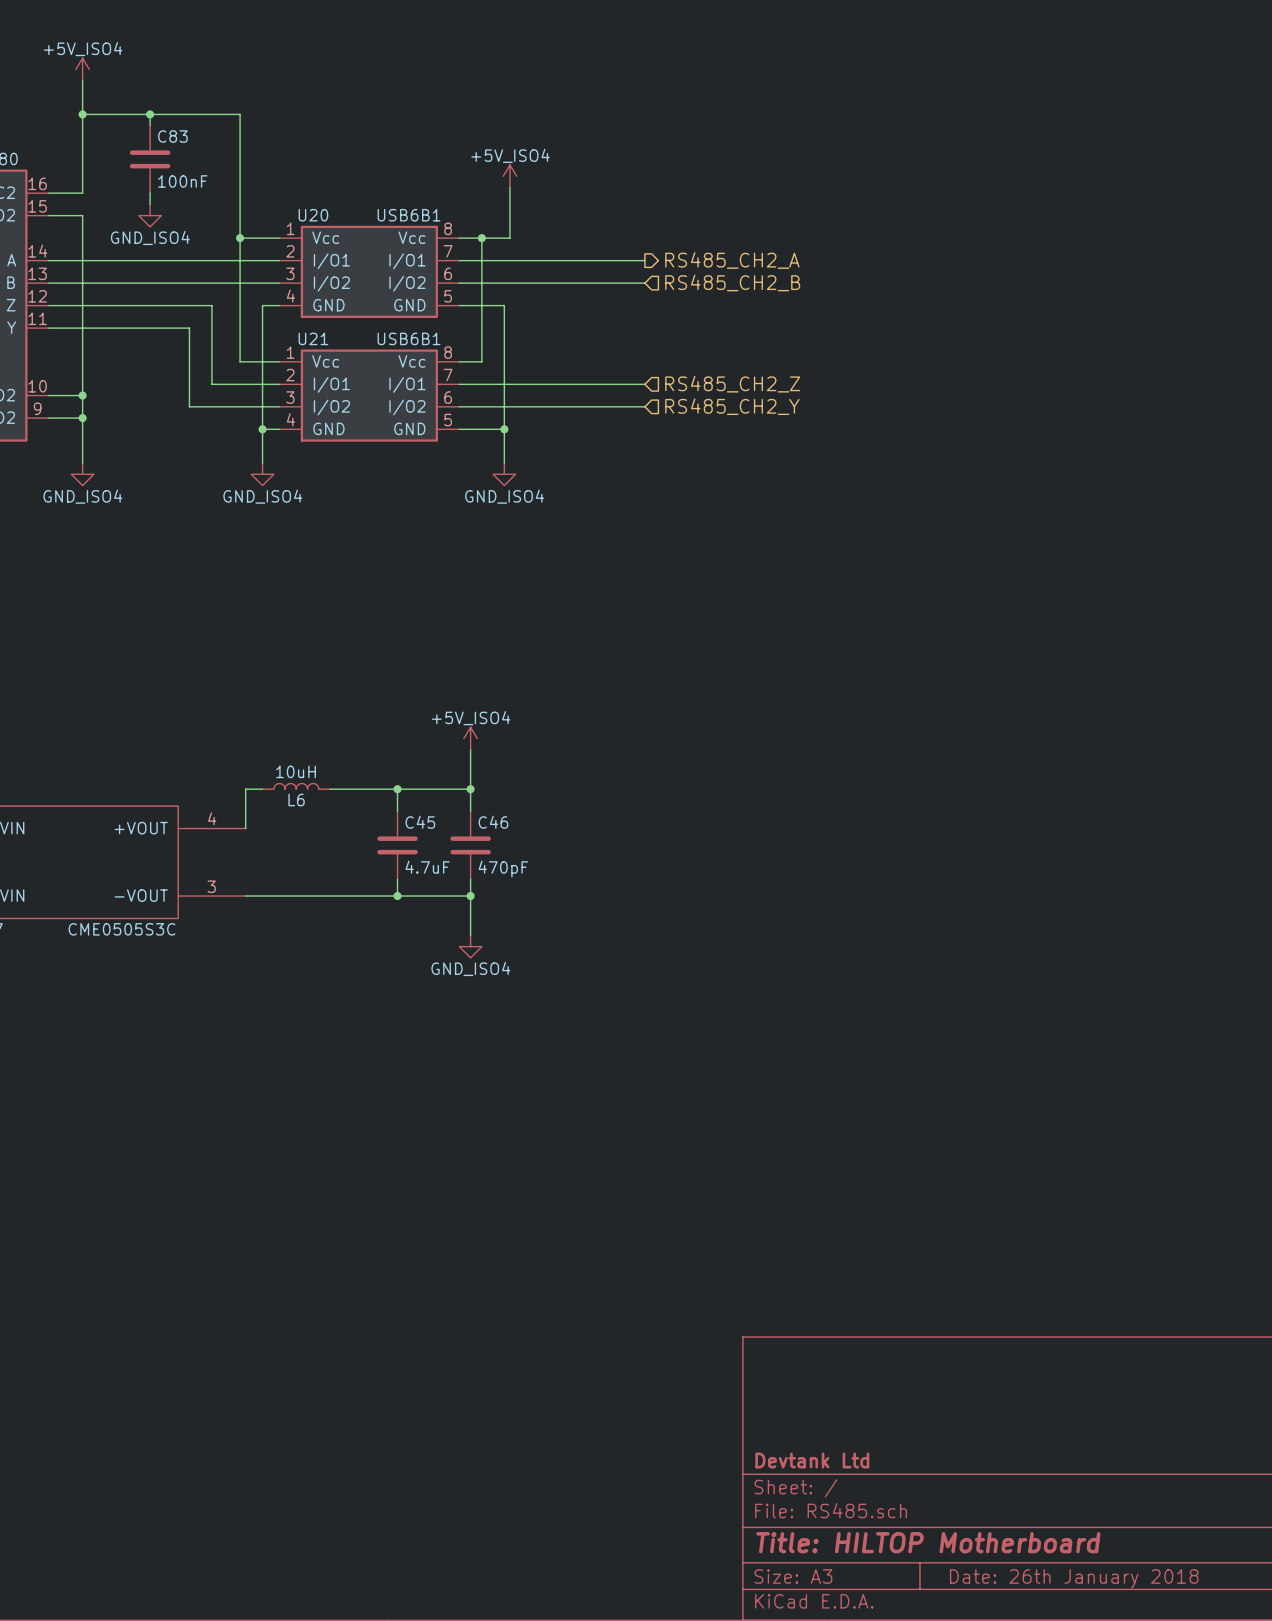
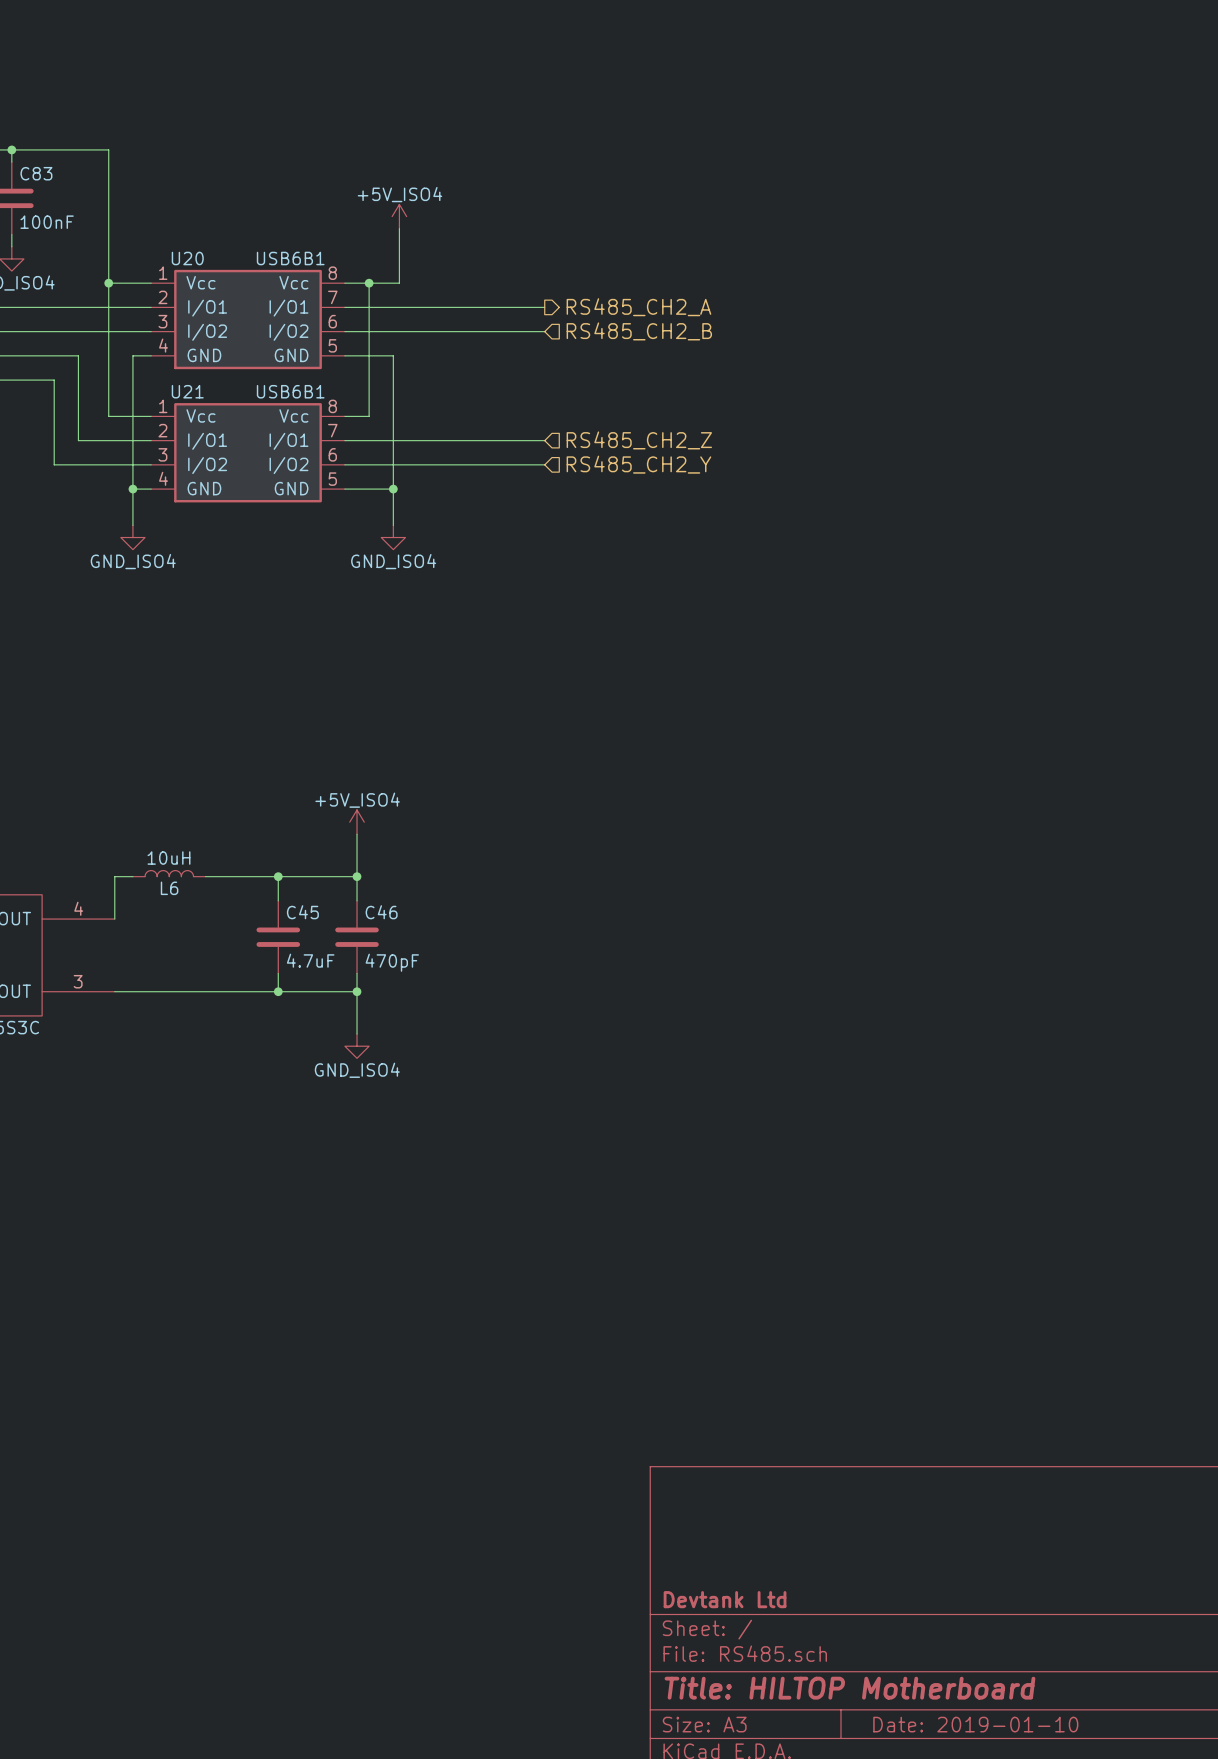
title block: Date: 26th January 2018 (1074, 1578) -> Date: 2019-01-10 (975, 1724)

